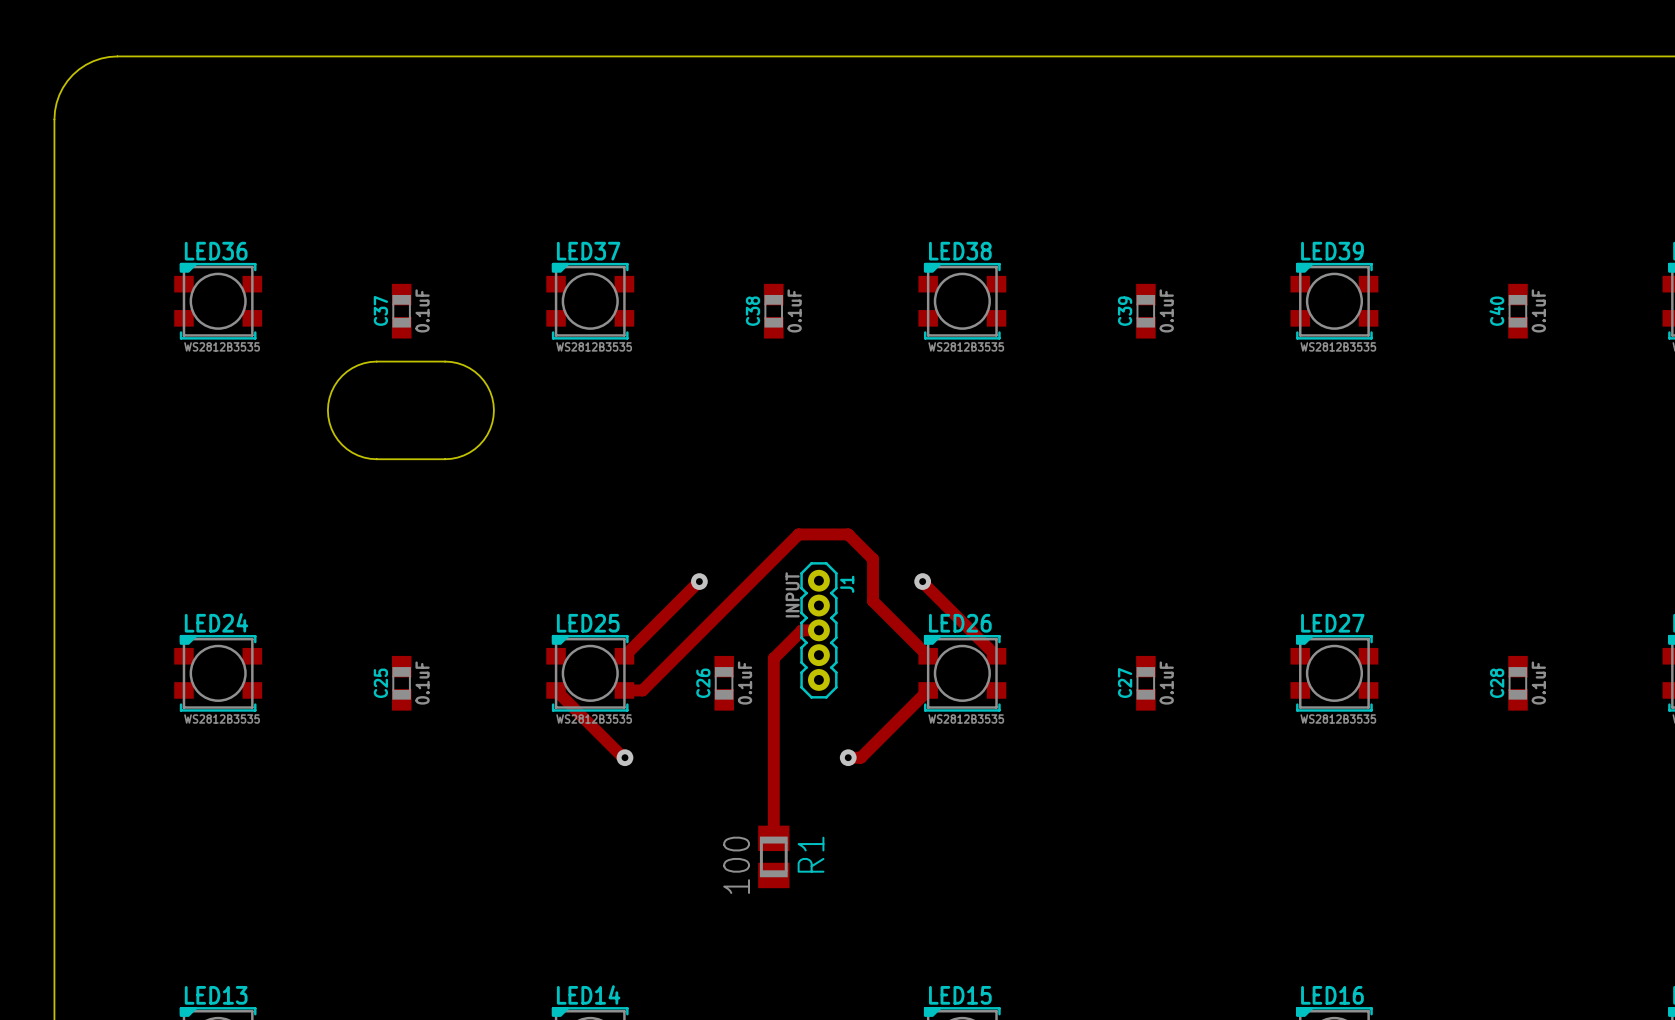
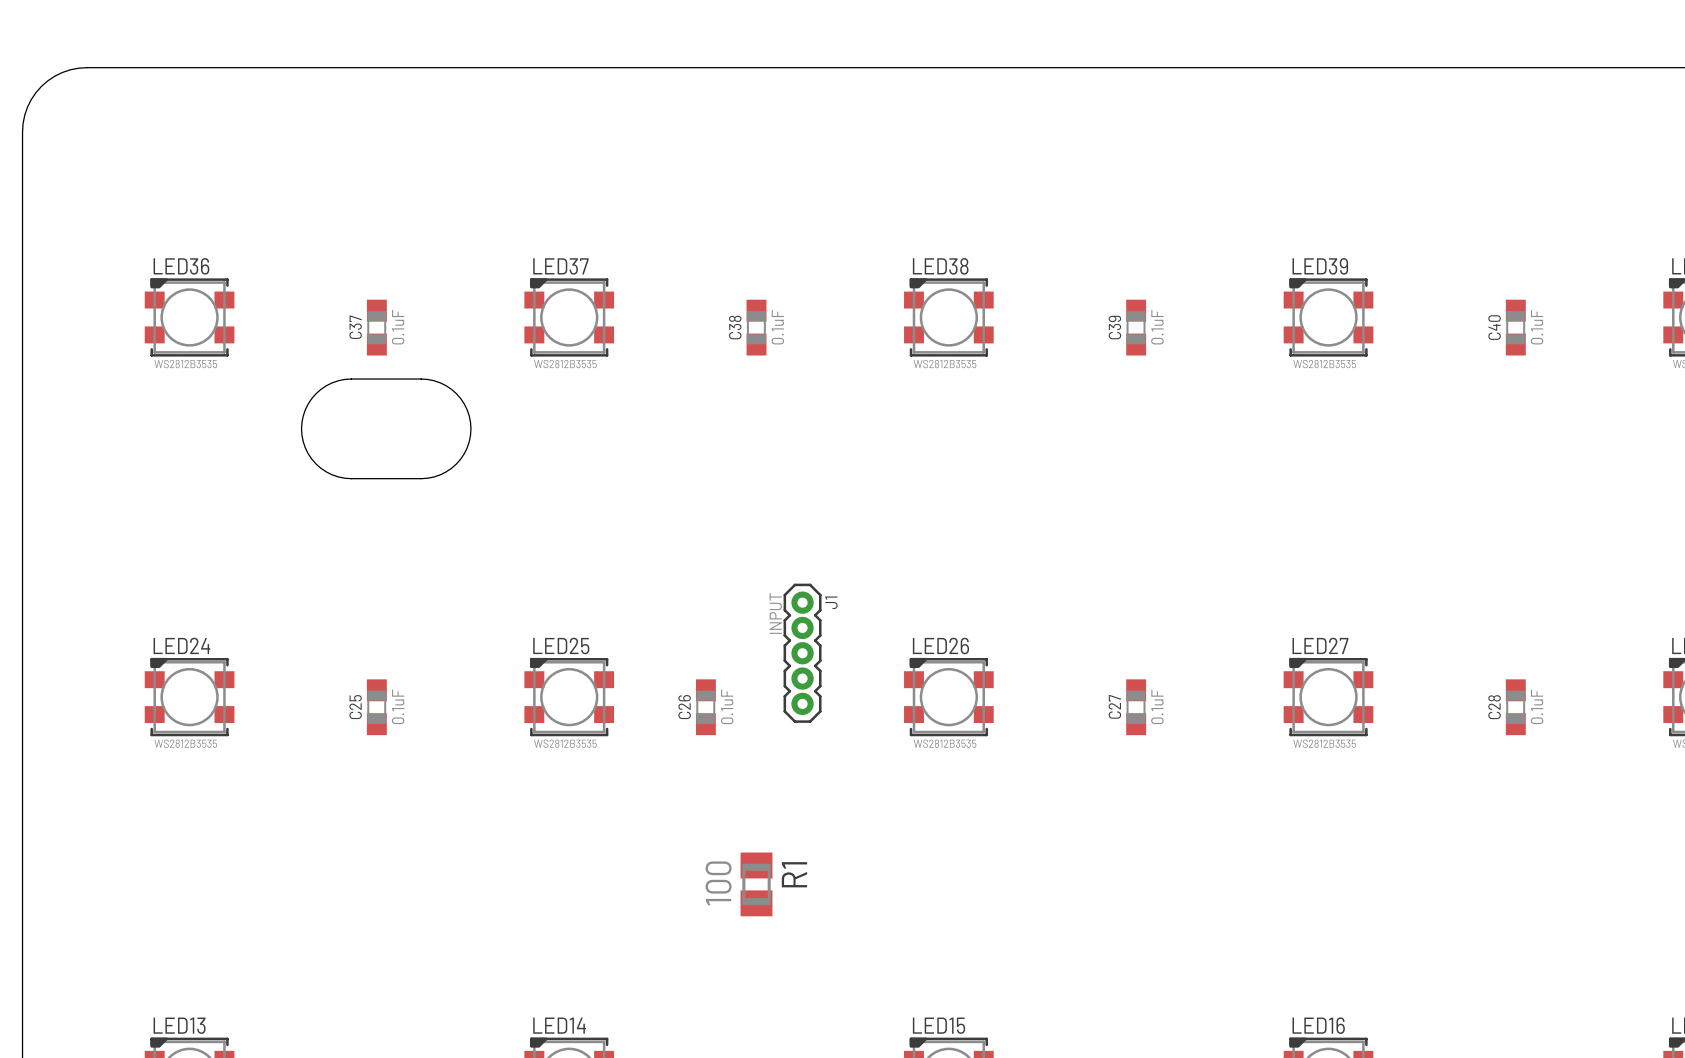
track: (699, 581) (624, 656) -> none
via: (699, 581) -> none
track: (922, 581) (996, 656) -> none
via: (922, 581) -> none
track: (818, 630) (801, 630) (773, 658) (773, 838) -> none
track: (928, 656) (873, 601) (873, 559) (848, 534) (798, 534) (642, 690) (624, 690) -> none
track: (556, 690) (624, 757) -> none
track: (928, 690) (860, 757) (848, 757) -> none
via: (624, 757) -> none
via: (848, 757) -> none

